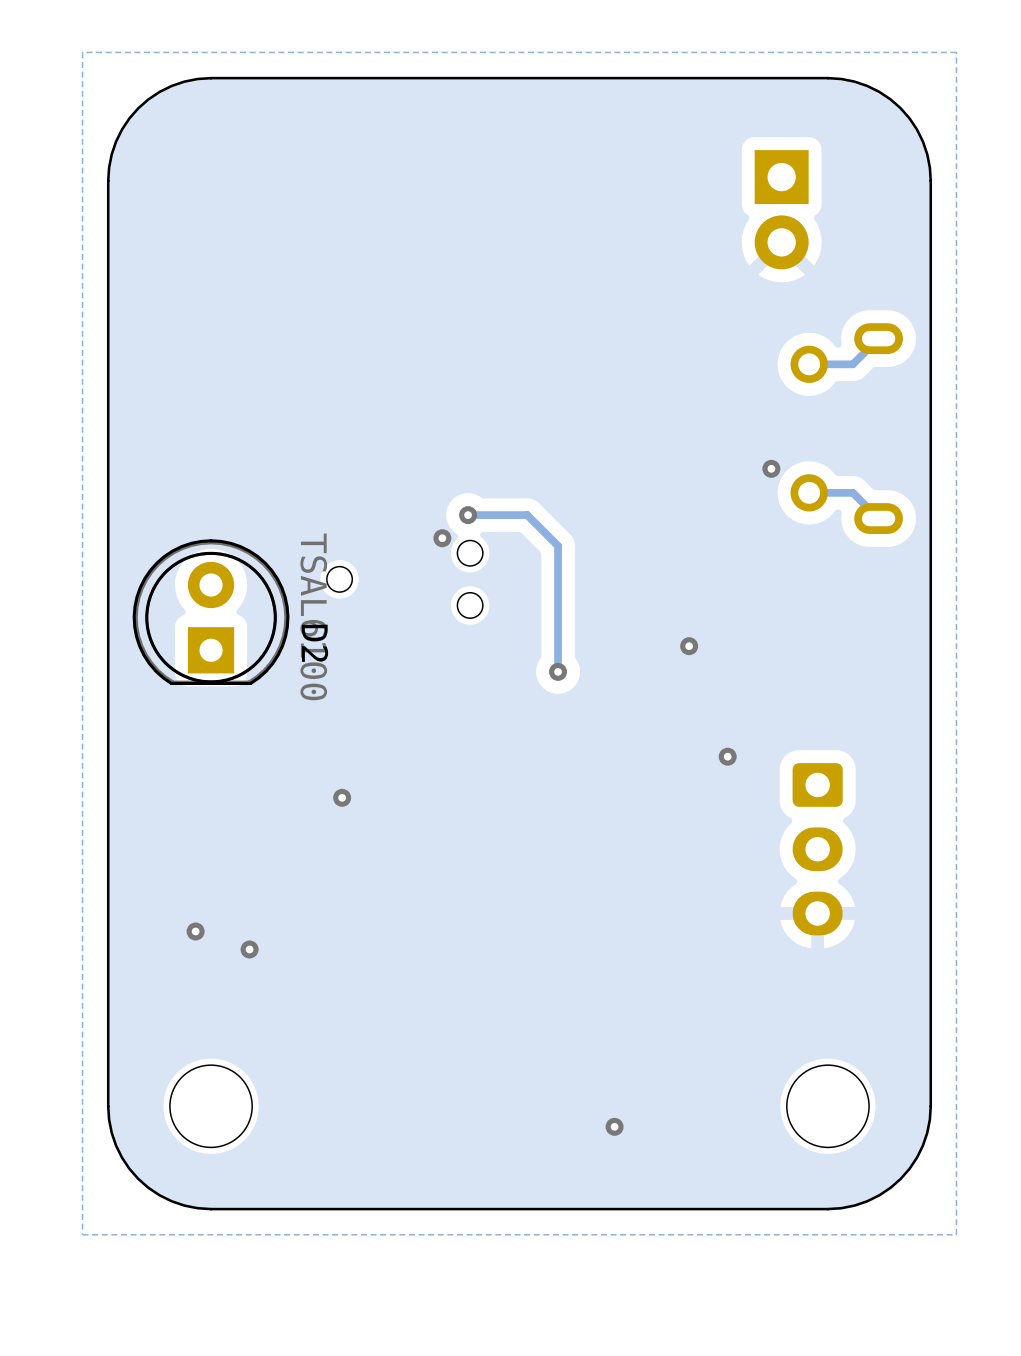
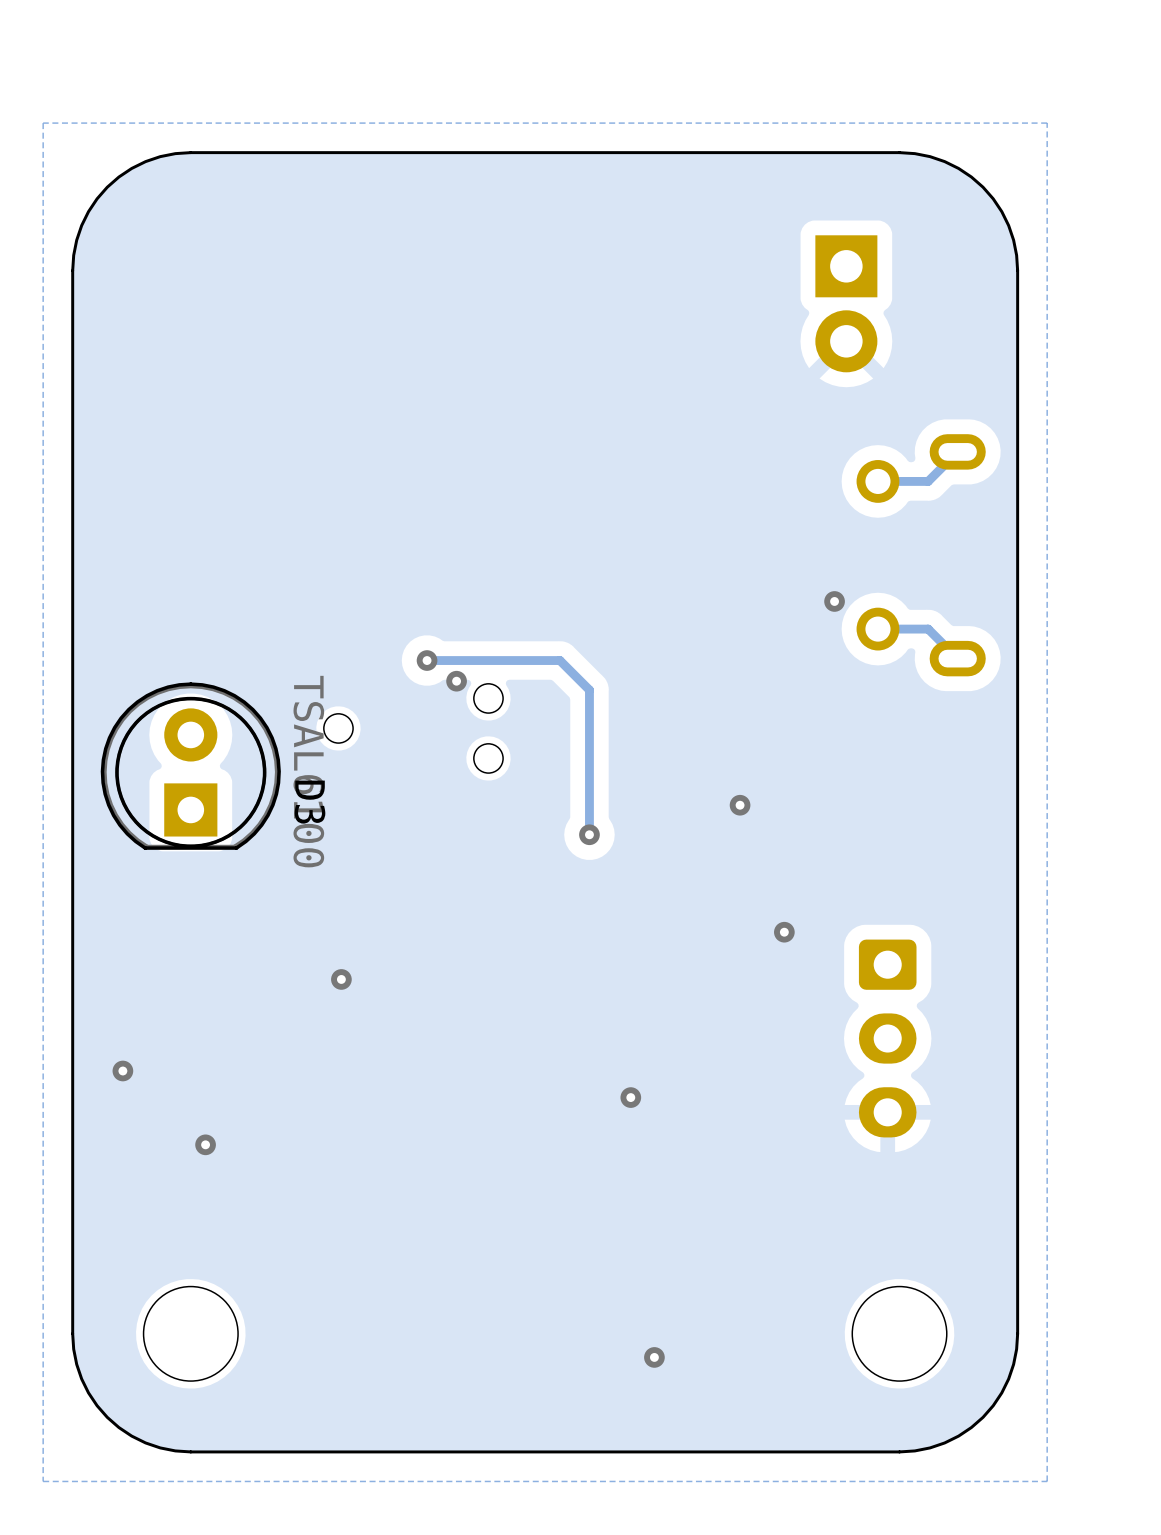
track: (468, 515) (527, 515) (532, 520) -> (427, 660) (559, 660)
via position: (468, 515) -> (427, 660)
D2 name: D2 (315, 643) -> D3 (310, 802)
via: none -> (122, 1070)
via: none -> (630, 1097)
via: (195, 931) -> none
via: none -> (205, 1144)
via: (249, 949) -> none

